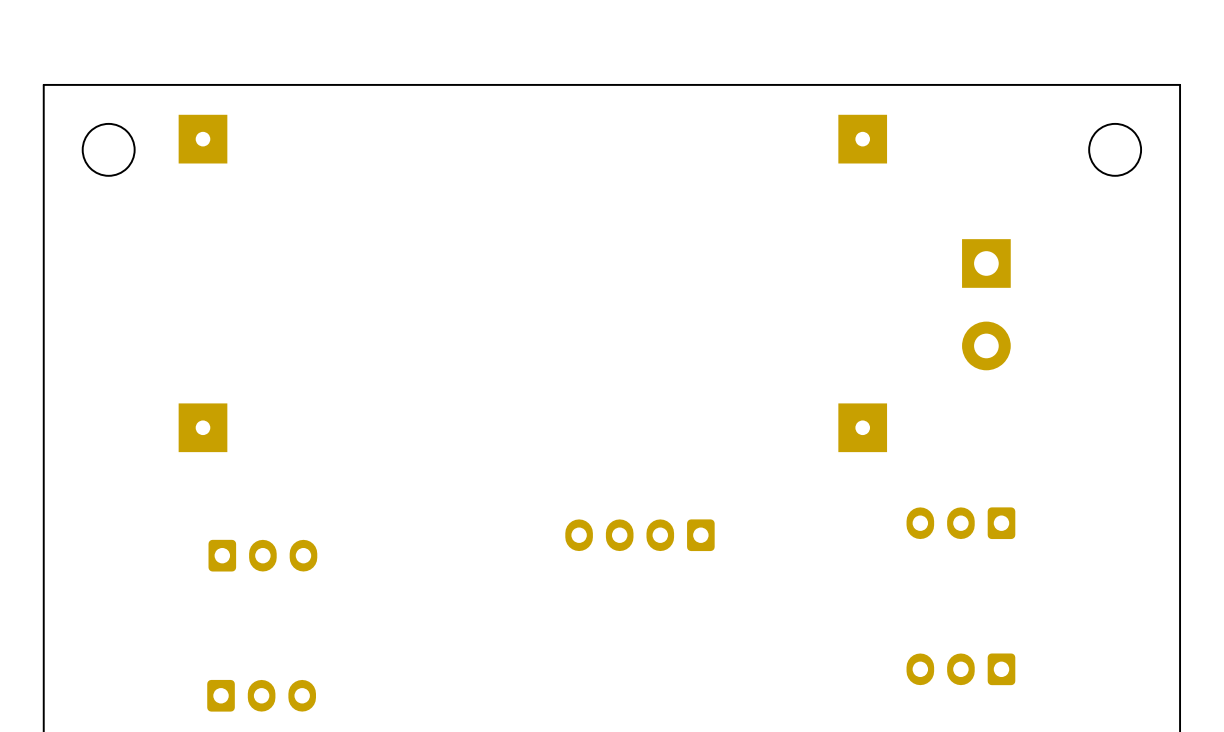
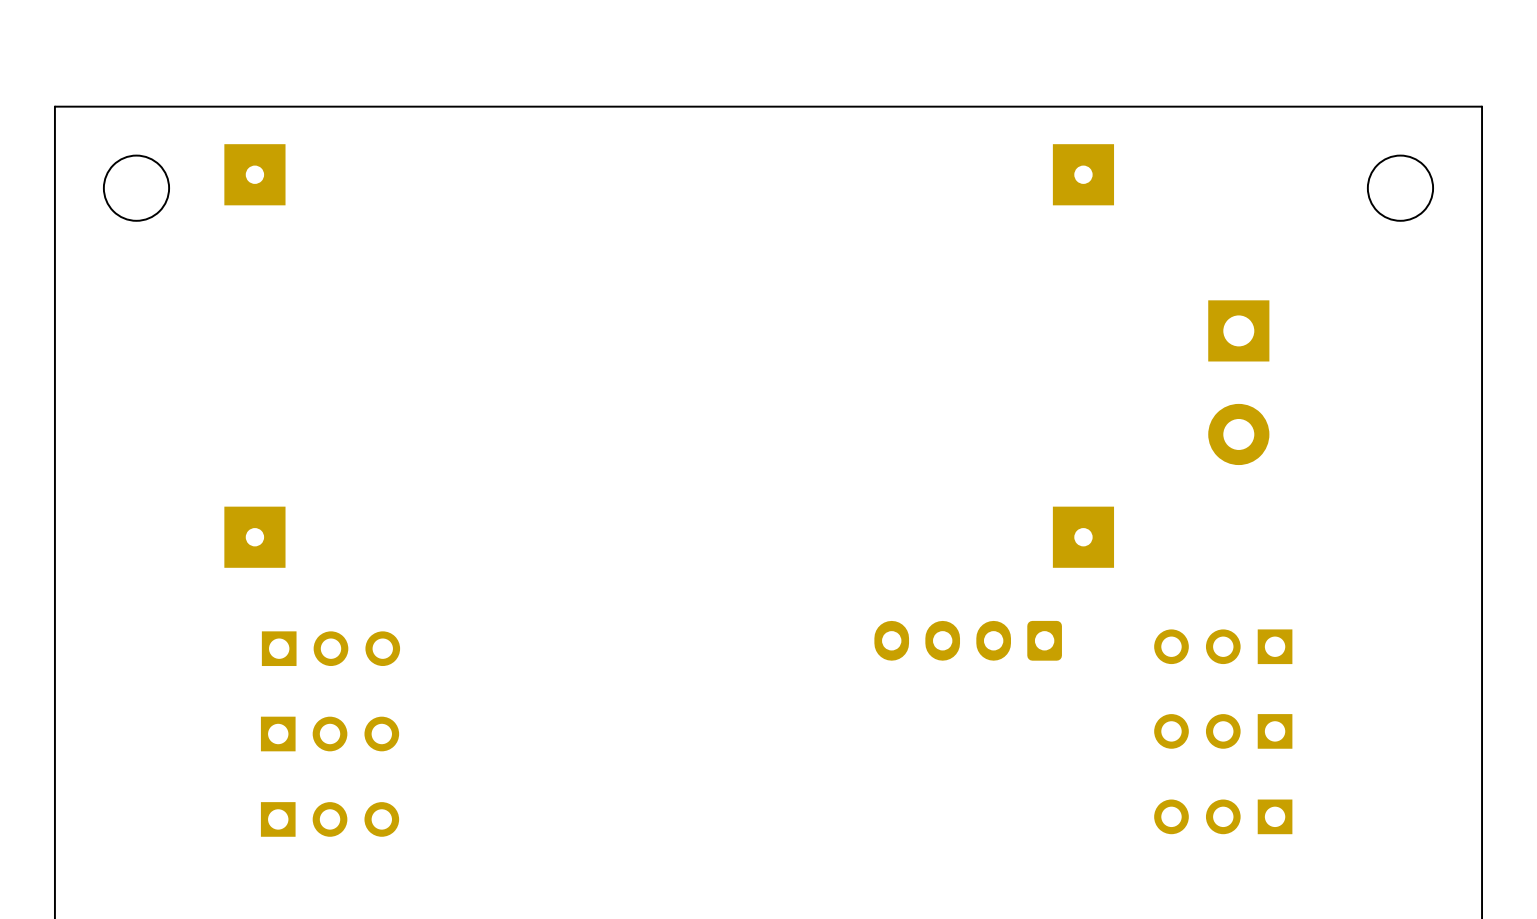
part footprint: [906, 507, 1016, 540] -> [1154, 629, 1293, 665]
part: none -> (330, 648)
part position: (639, 535) -> (968, 640)
part: (262, 555) -> none
part: none -> (1223, 731)
part: none -> (330, 734)
part: none -> (1223, 816)
part: none -> (330, 819)
part: (960, 669) -> none
part: (261, 695) -> none

